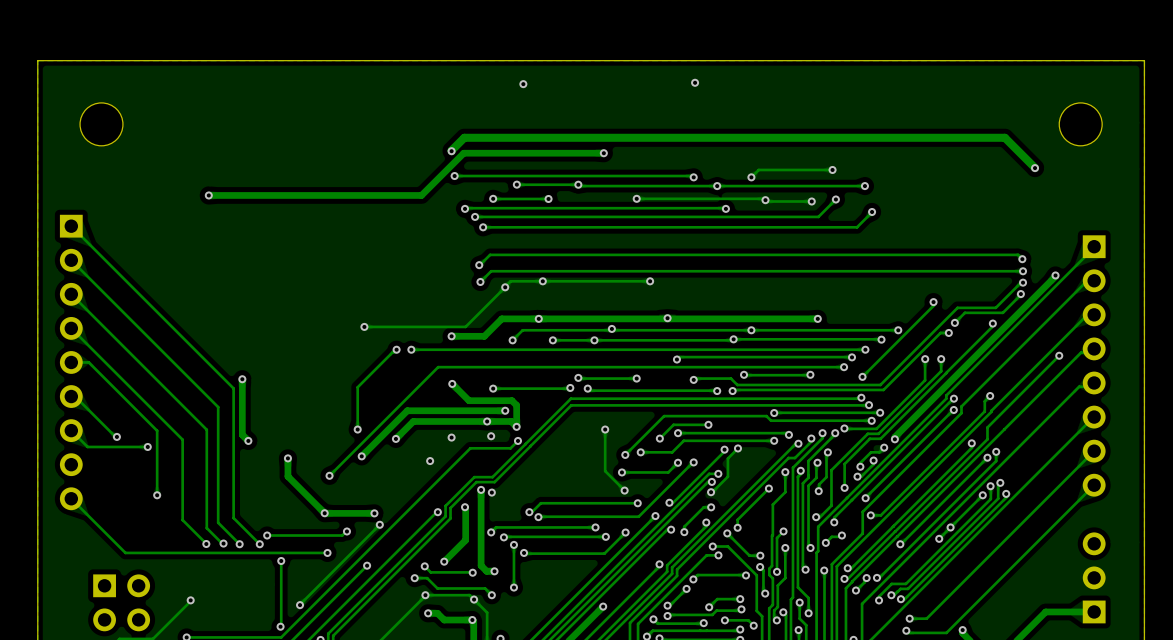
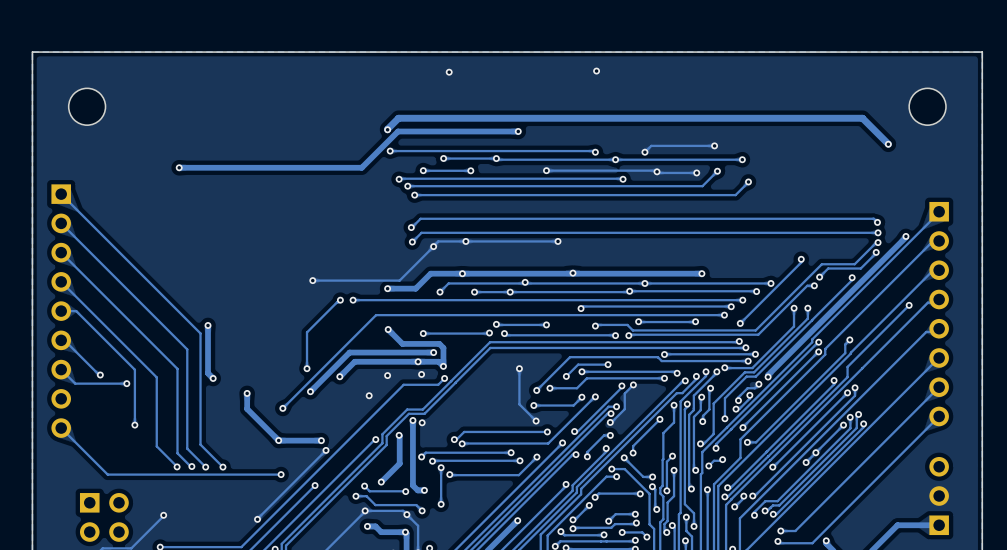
track: (346, 531) (342, 535) (267, 535) -> none
via: (346, 531) -> none
via: (267, 535) -> none
track: (281, 560) (280, 626) -> none
via: (281, 560) -> none
via: (280, 626) -> none

